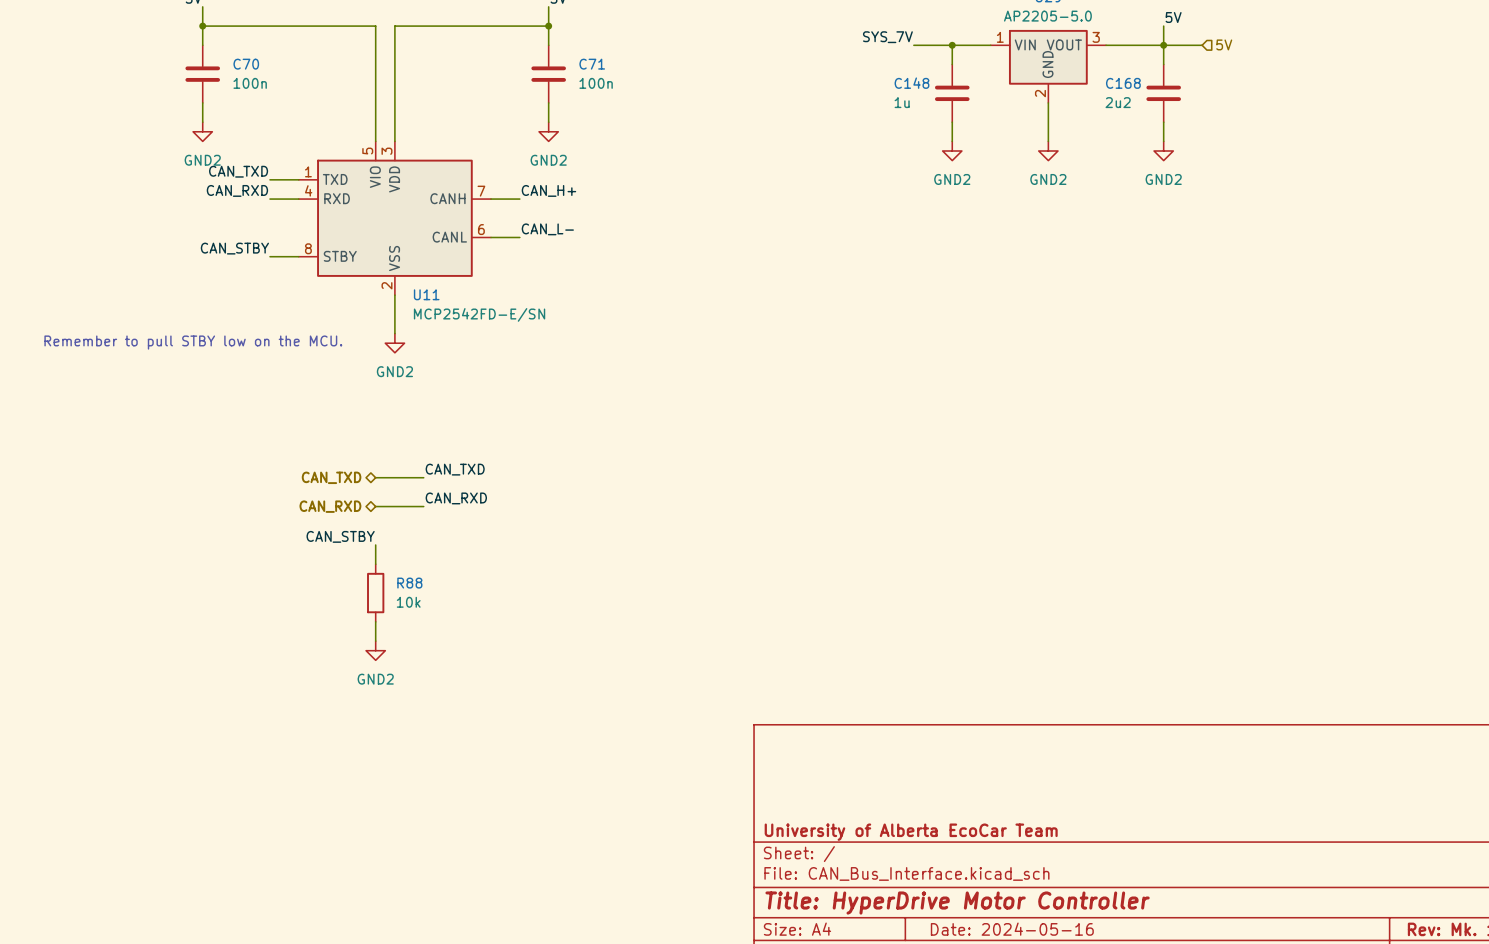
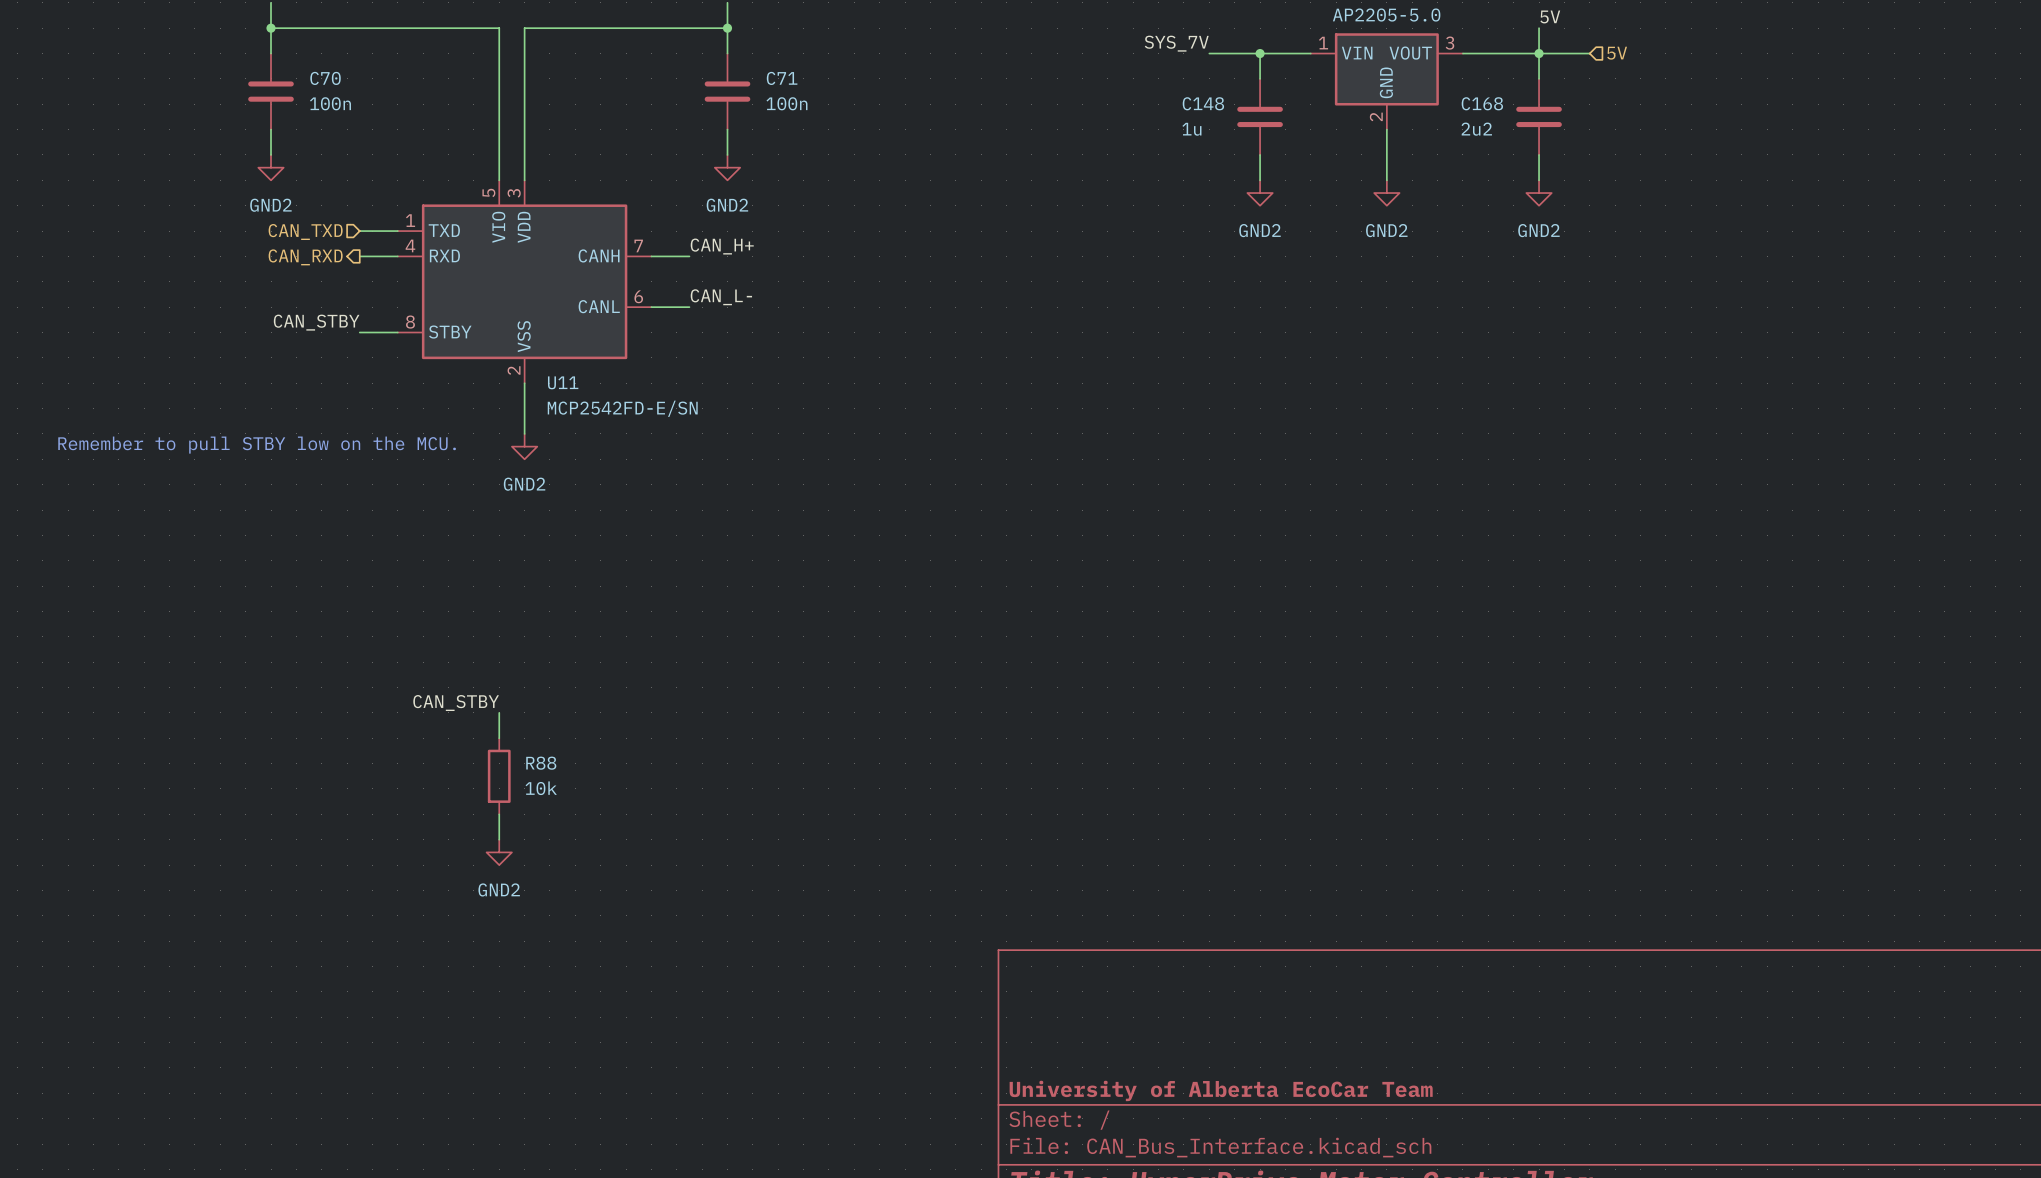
label: CAN_TXD (238, 171) -> none
hierarchical label: none -> CAN_TXD (305, 232)
label: CAN_RXD (237, 190) -> none
hierarchical label: none -> CAN_RXD (305, 257)
label: CAN_TXD (455, 469) -> none
hierarchical label: CAN_TXD (331, 477) -> none
wire: (375, 477) (423, 477) -> none
label: CAN_RXD (456, 498) -> none
hierarchical label: CAN_RXD (330, 506) -> none
wire: (375, 506) (423, 506) -> none

